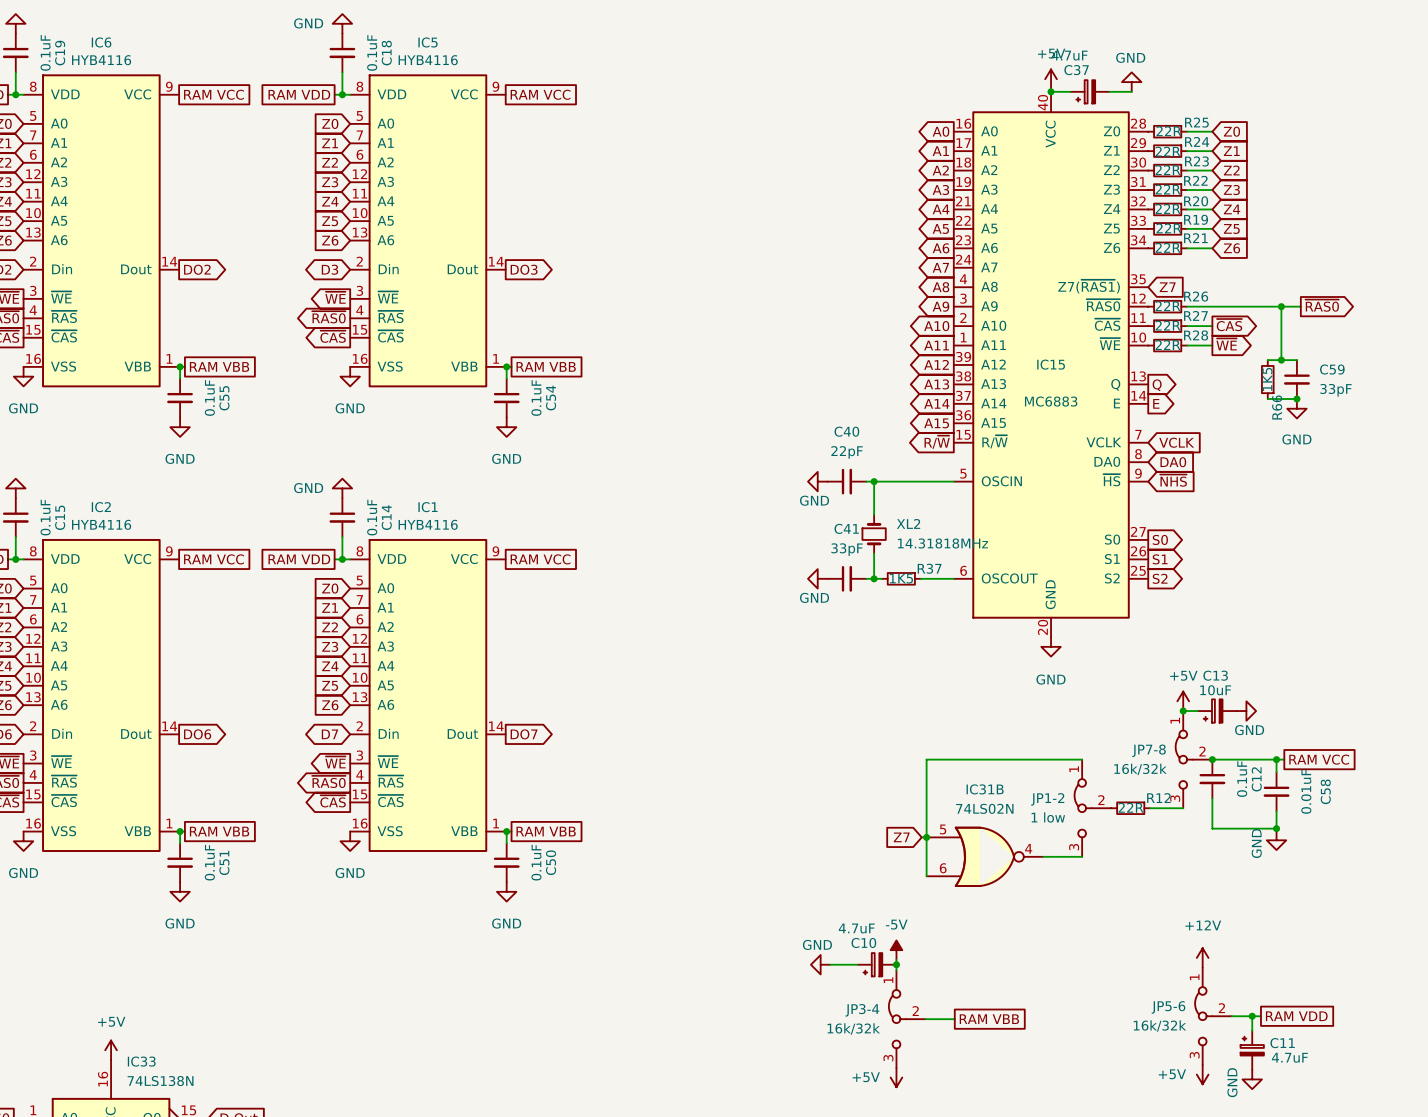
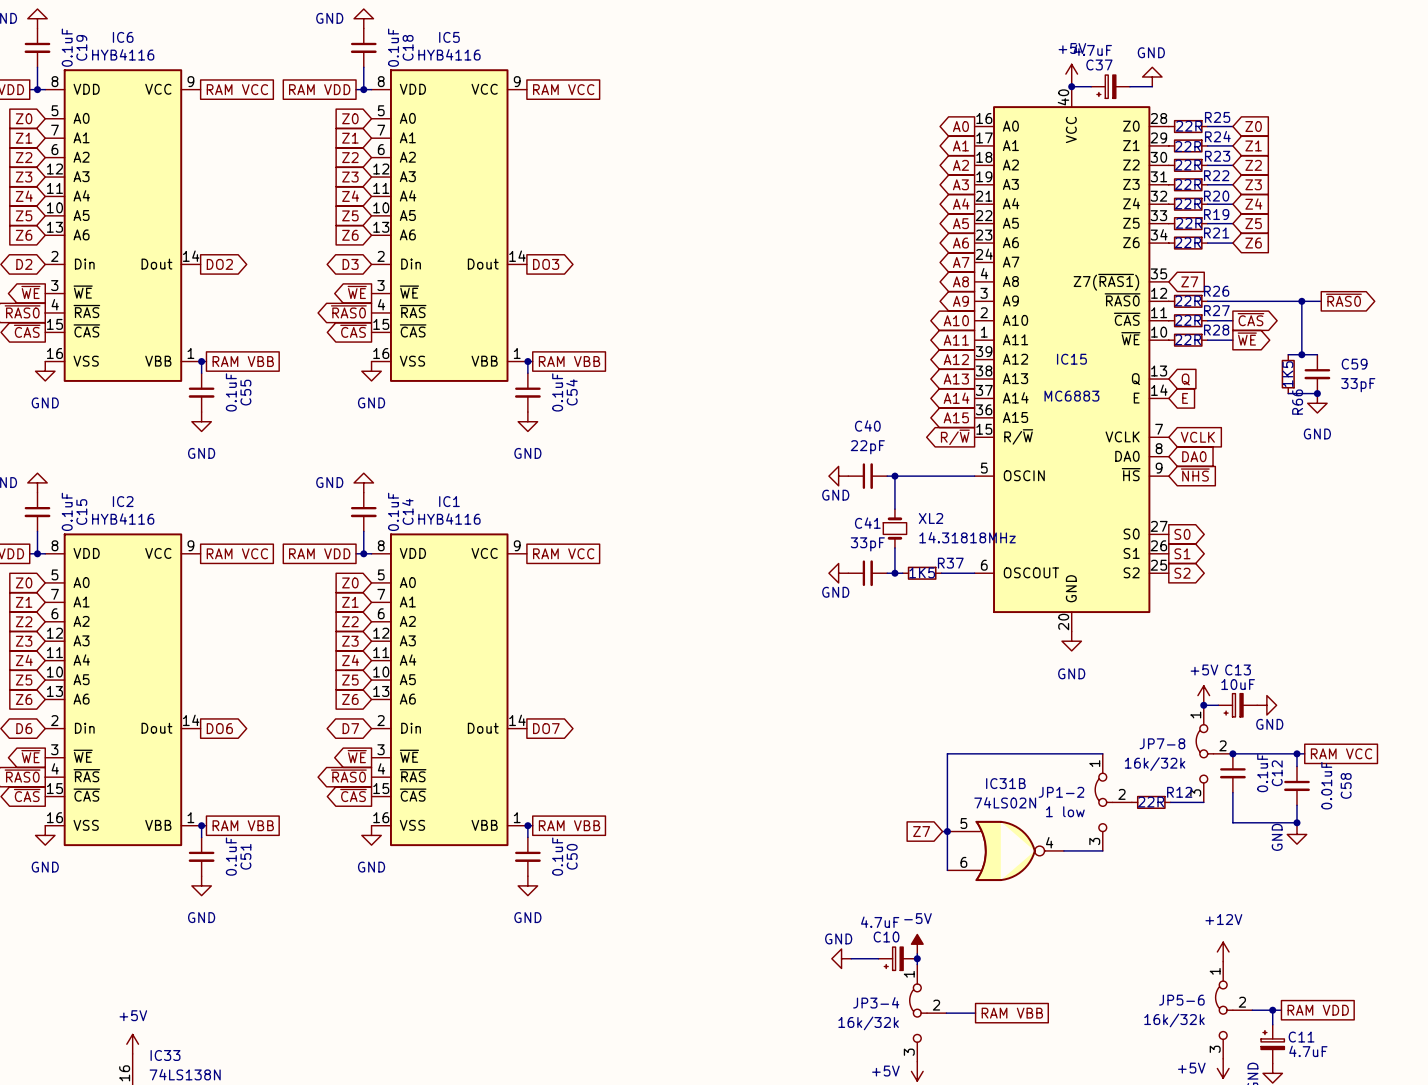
global label shape: output (1157, 385) -> input (1185, 379)
global label shape: output (1156, 403) -> input (1185, 398)

